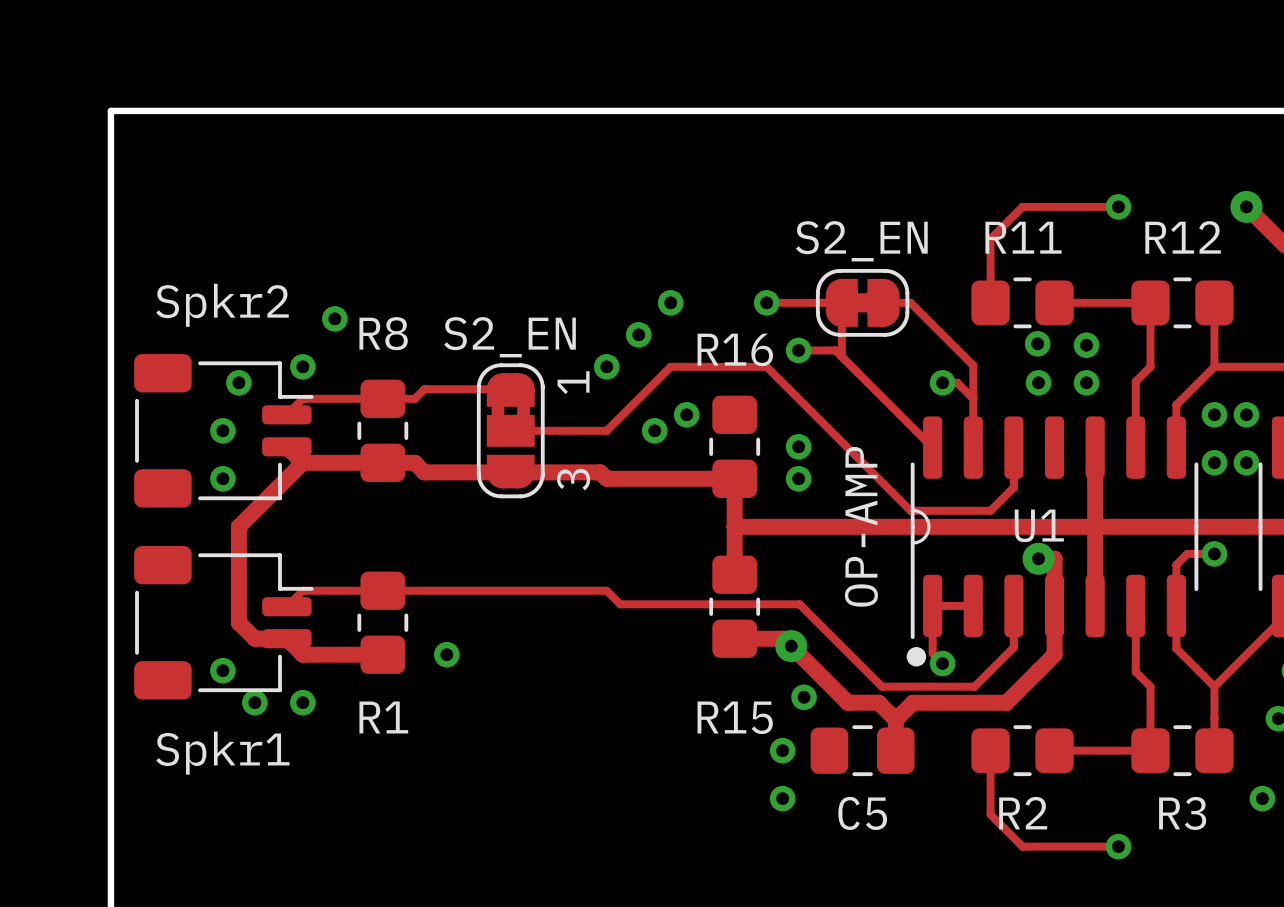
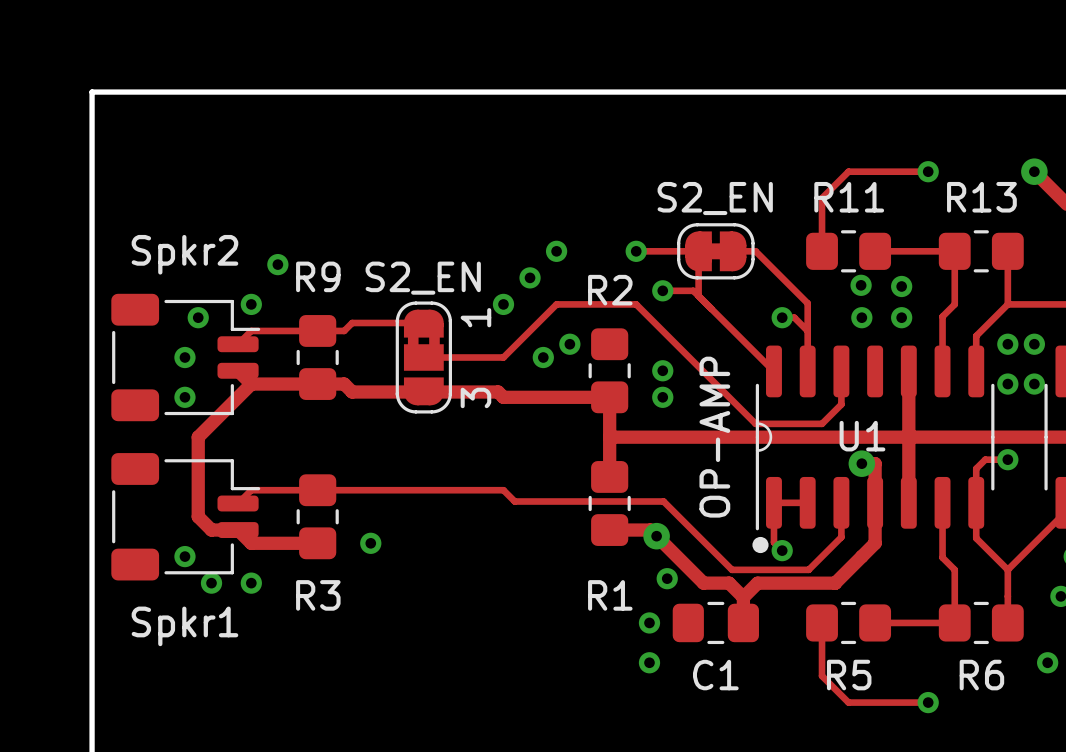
R12 name: R12 (1183, 237) -> R13 (981, 197)
R8 name: R8 (383, 333) -> R9 (318, 276)
R16 name: R16 (735, 349) -> R2 (610, 290)
R1 name: R1 (383, 717) -> R3 (318, 595)
R15 name: R15 (735, 717) -> R1 (610, 595)
C5 name: C5 (862, 813) -> C1 (715, 675)
R2 name: R2 (1023, 813) -> R5 (849, 675)
R3 name: R3 (1182, 813) -> R6 (981, 675)

